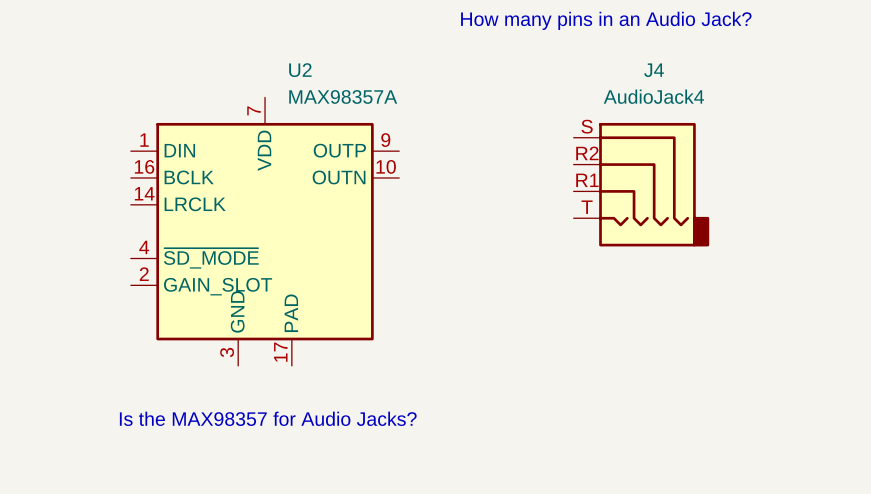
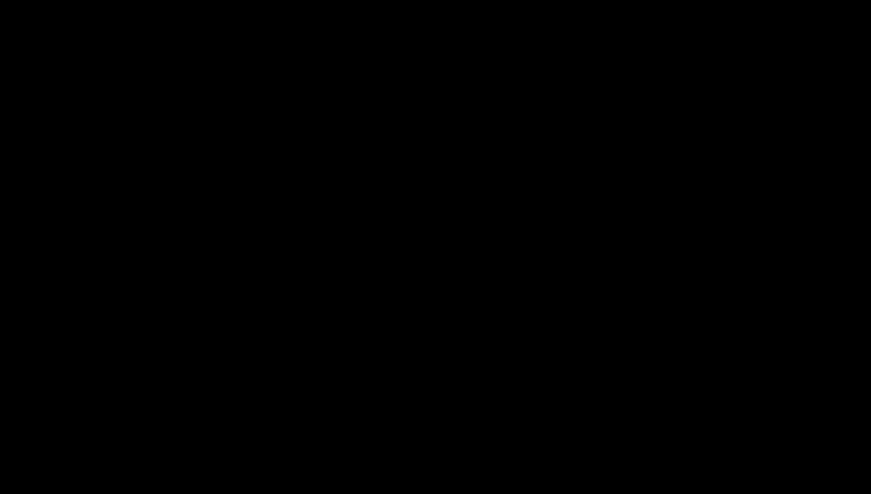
text: How many pins in an Audio Jack? (606, 20) -> none
J4: AudioJack4 (641, 184) -> none
U2: MAX98357A (265, 231) -> none
text: Is the MAX98357 for Audio Jacks? (268, 418) -> none

